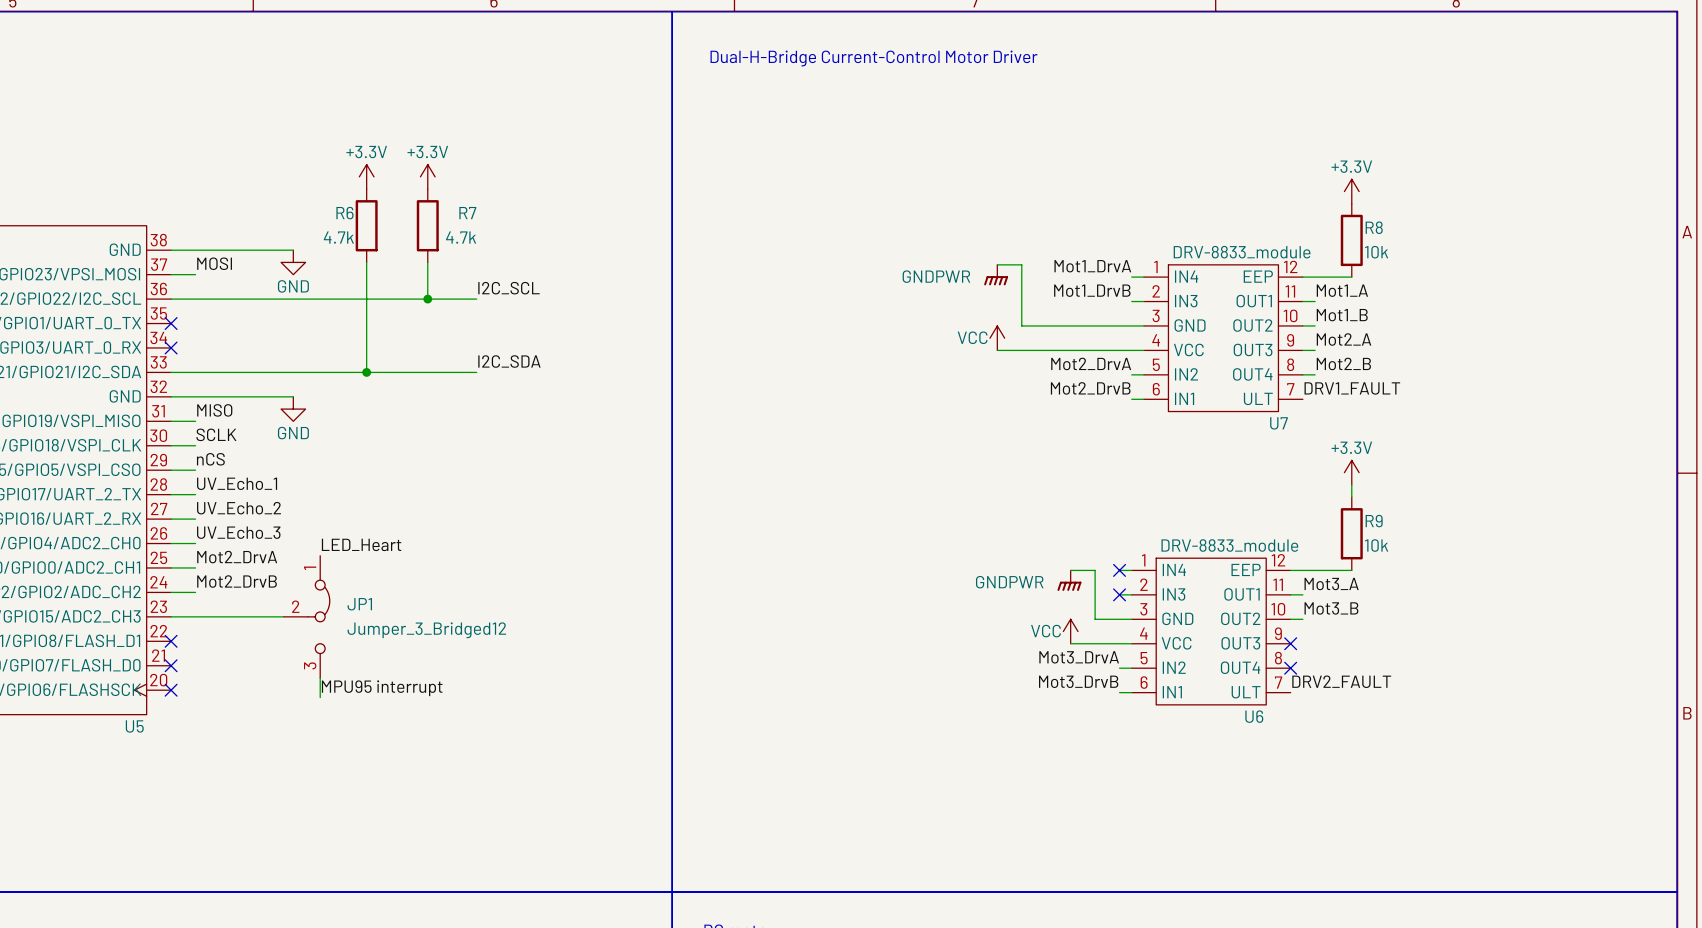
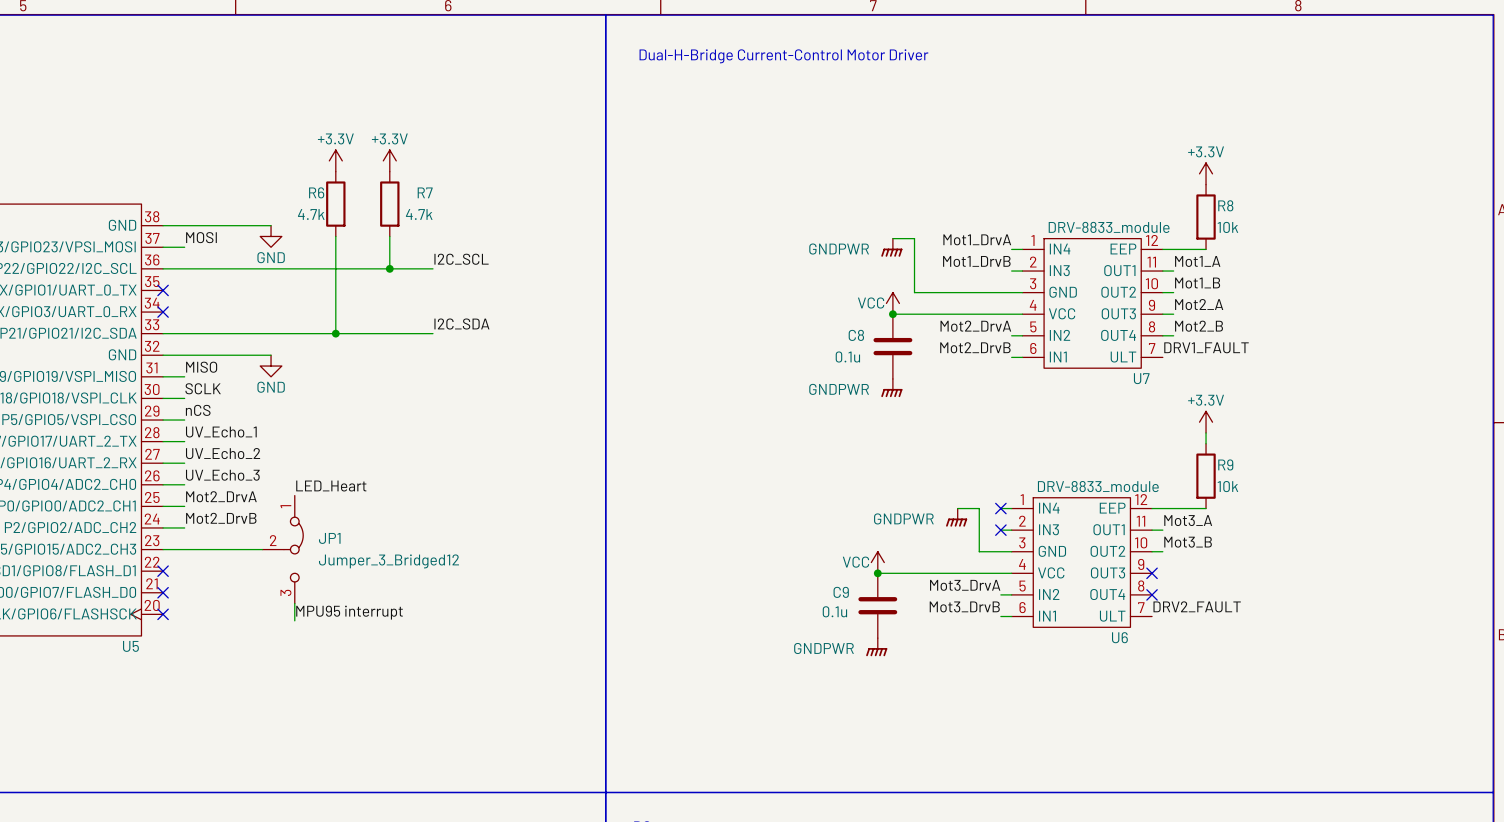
junction: none -> (892, 314)
C8: none -> 0.1u (892, 346)
power symbol: none -> GNDPWR (891, 388)
power symbol position: VCC (1070, 631) -> VCC (877, 562)
wire: none -> (877, 573) (957, 573)
junction: none -> (877, 573)
C9: none -> 0.1u (877, 605)
power symbol: none -> GNDPWR (876, 647)

